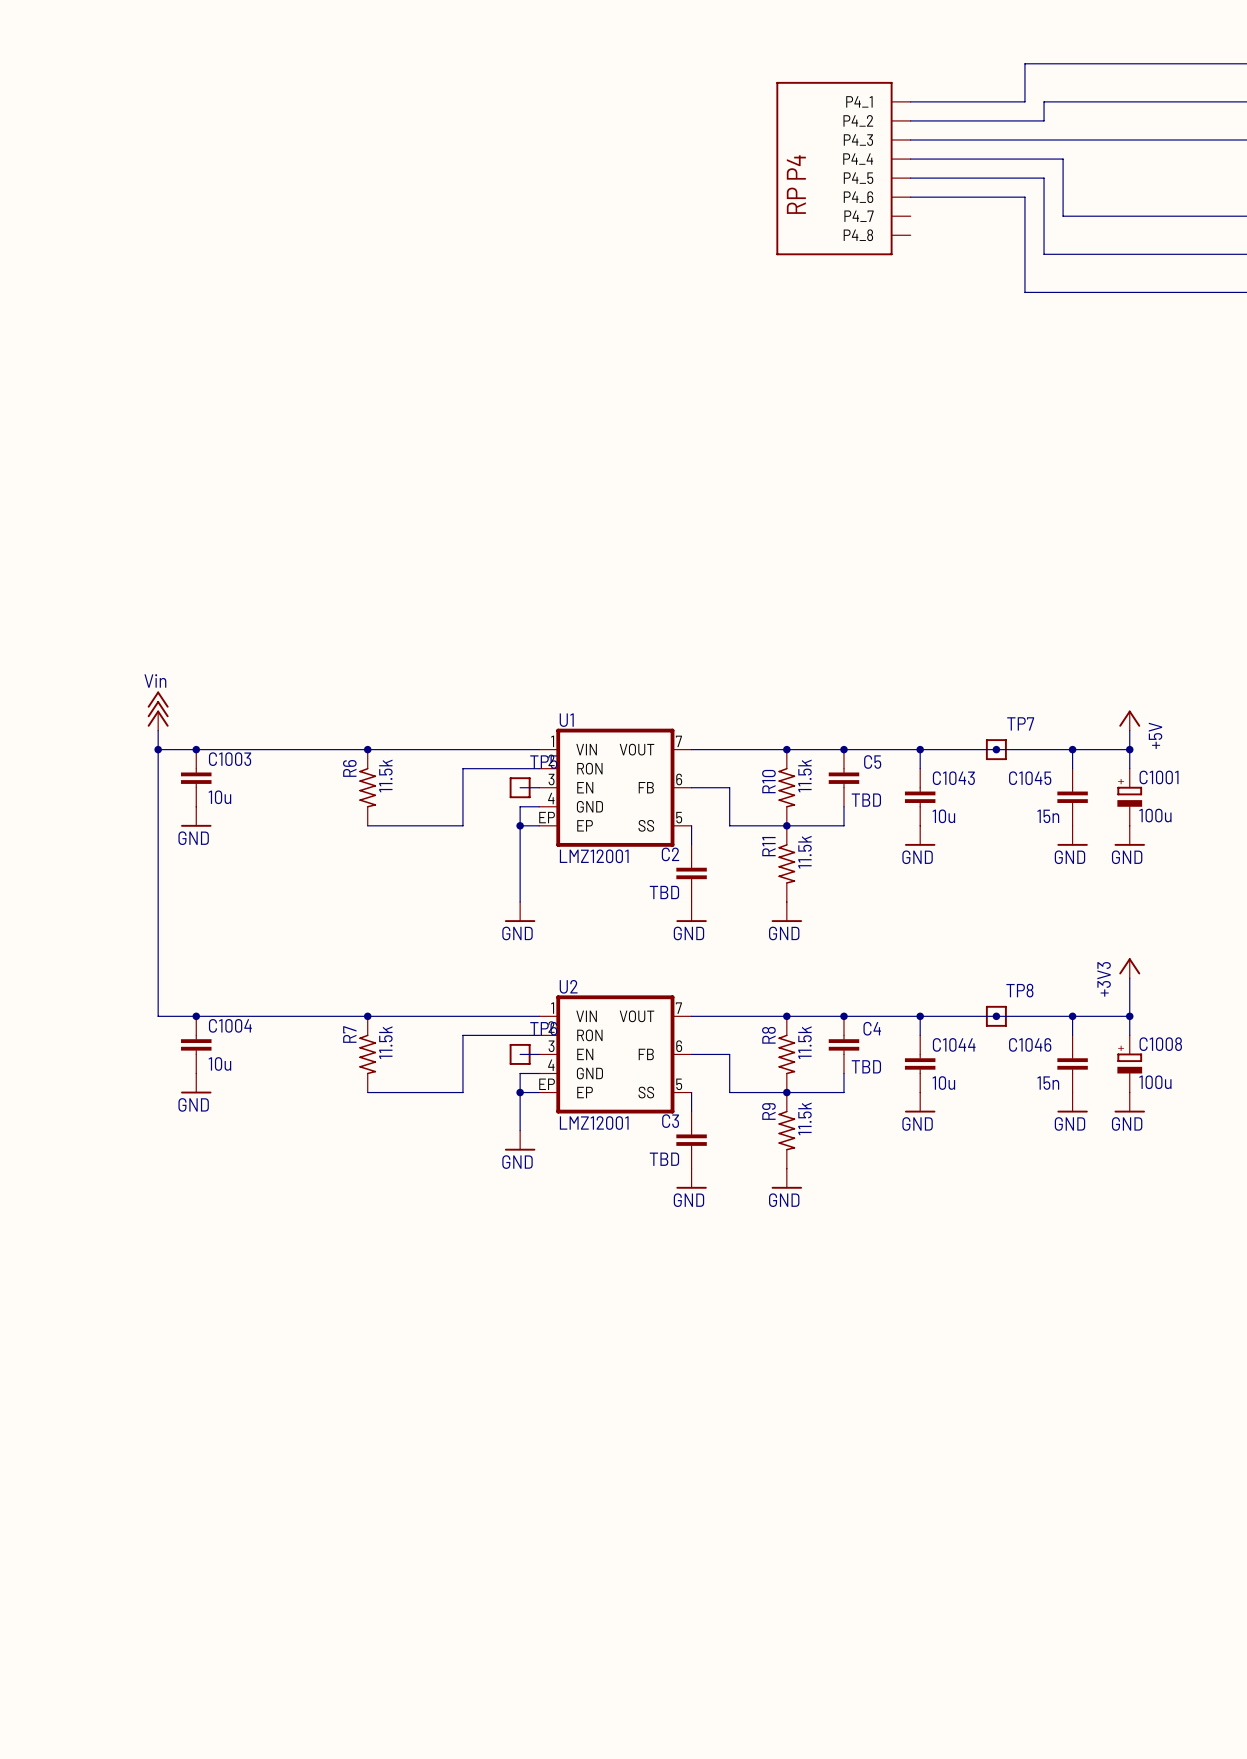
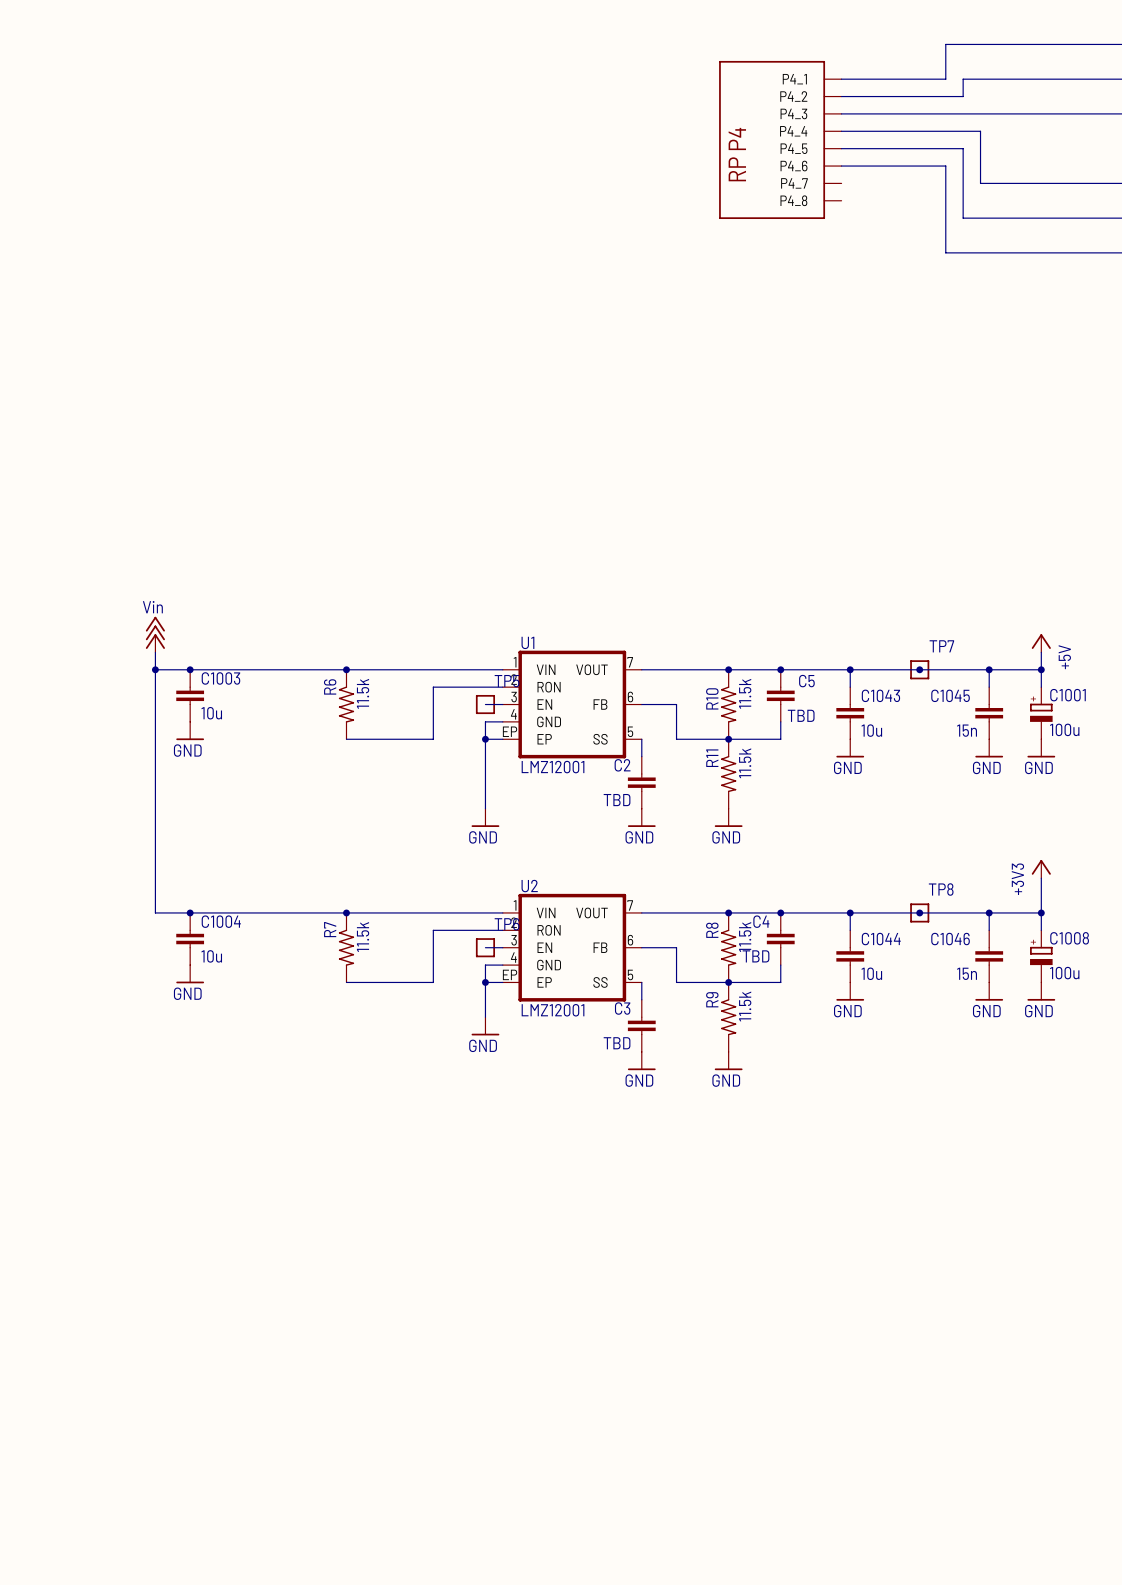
C4 name position: C4 (872, 1028) -> C4 (761, 921)
C4 value position: TBD (866, 1066) -> TBD (756, 956)

